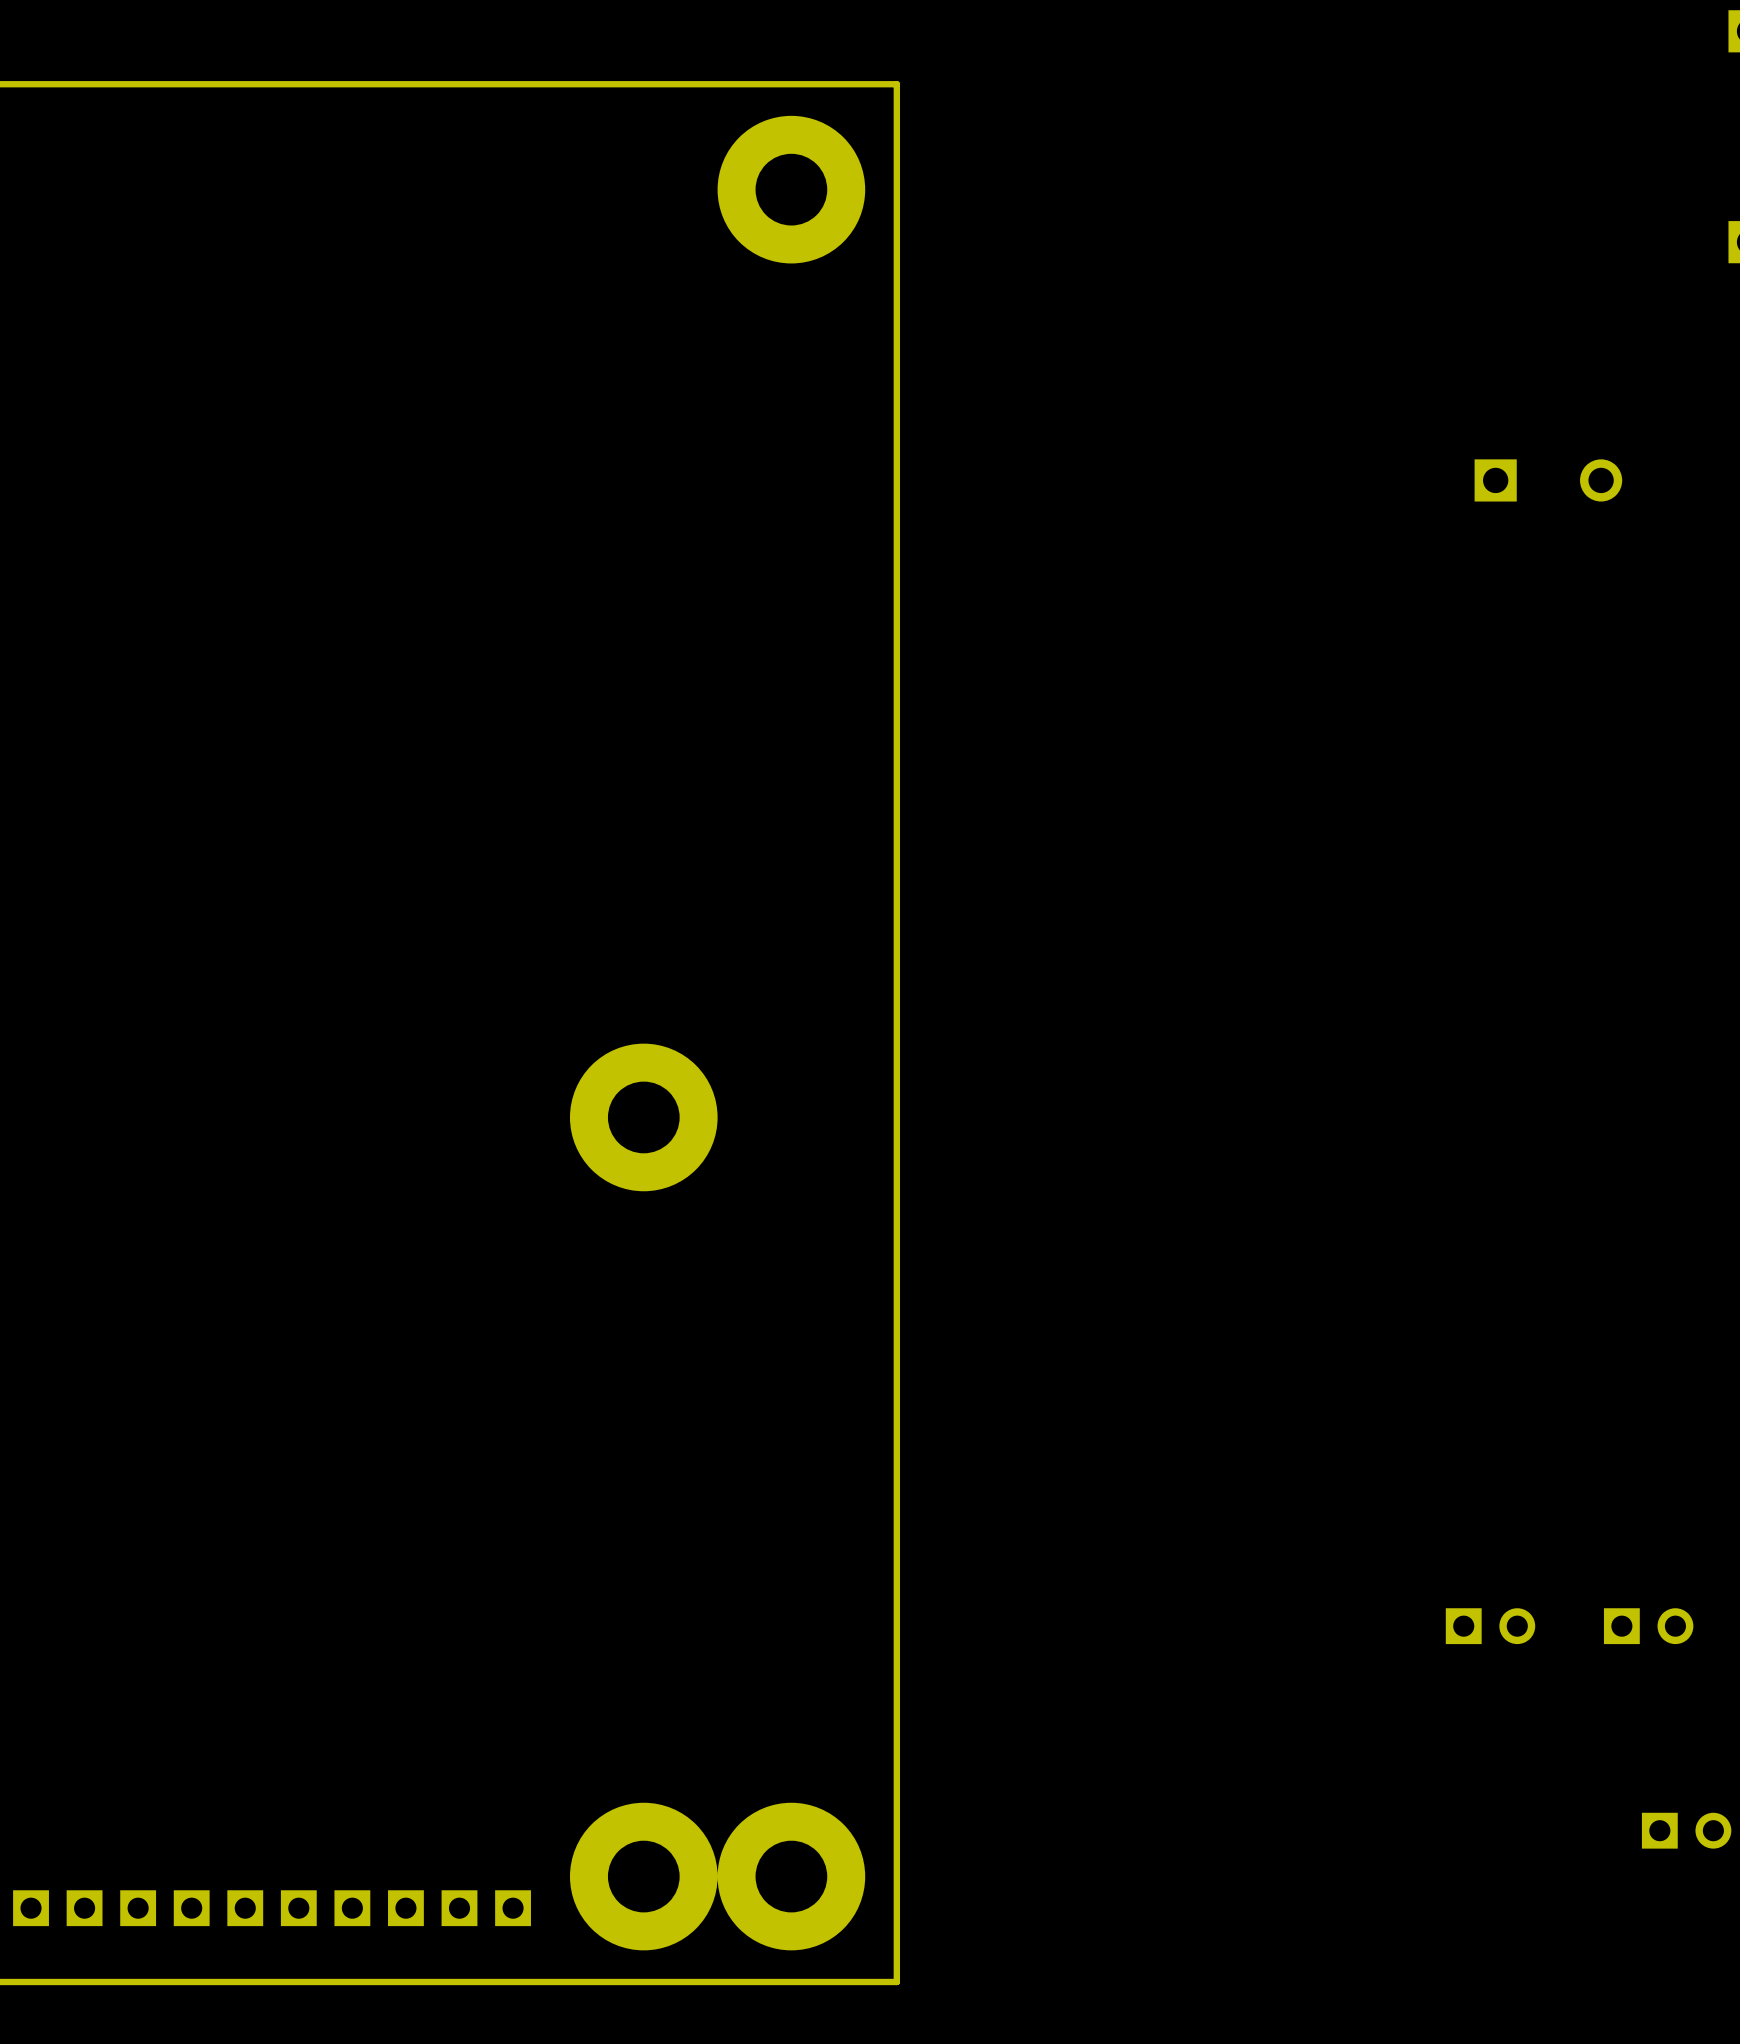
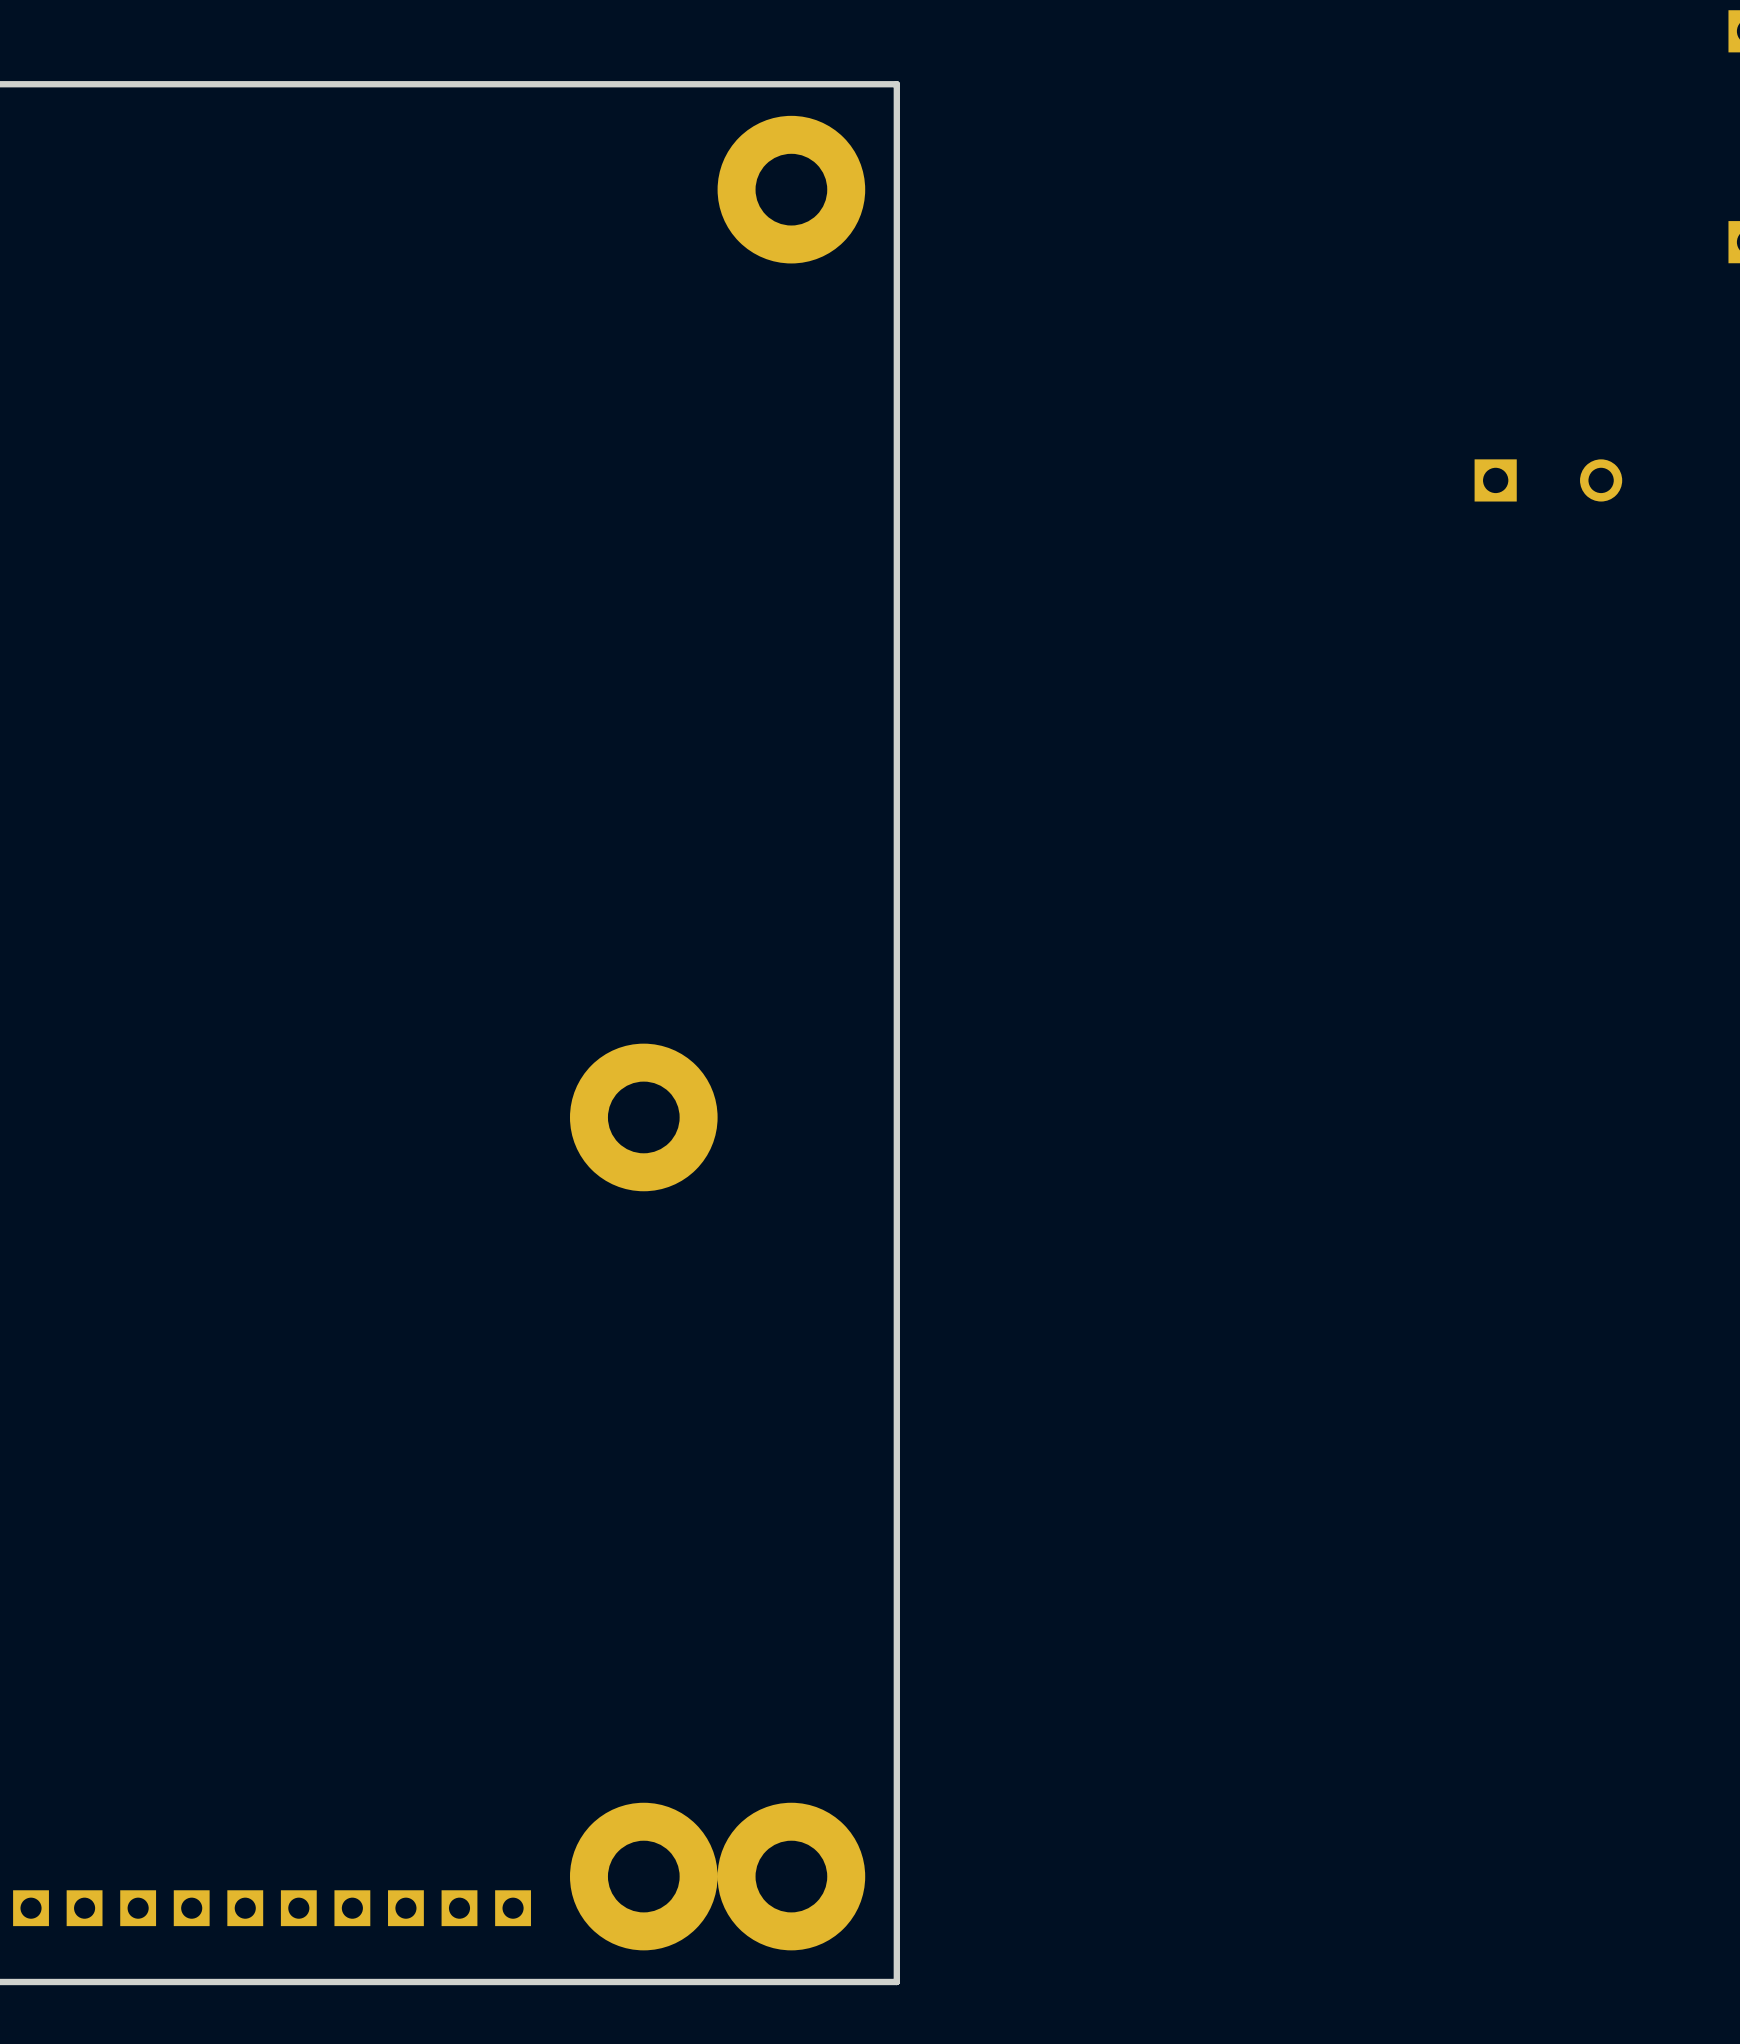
part: (1490, 1626) -> none
part: (1648, 1626) -> none
part: (1686, 1830) -> none

